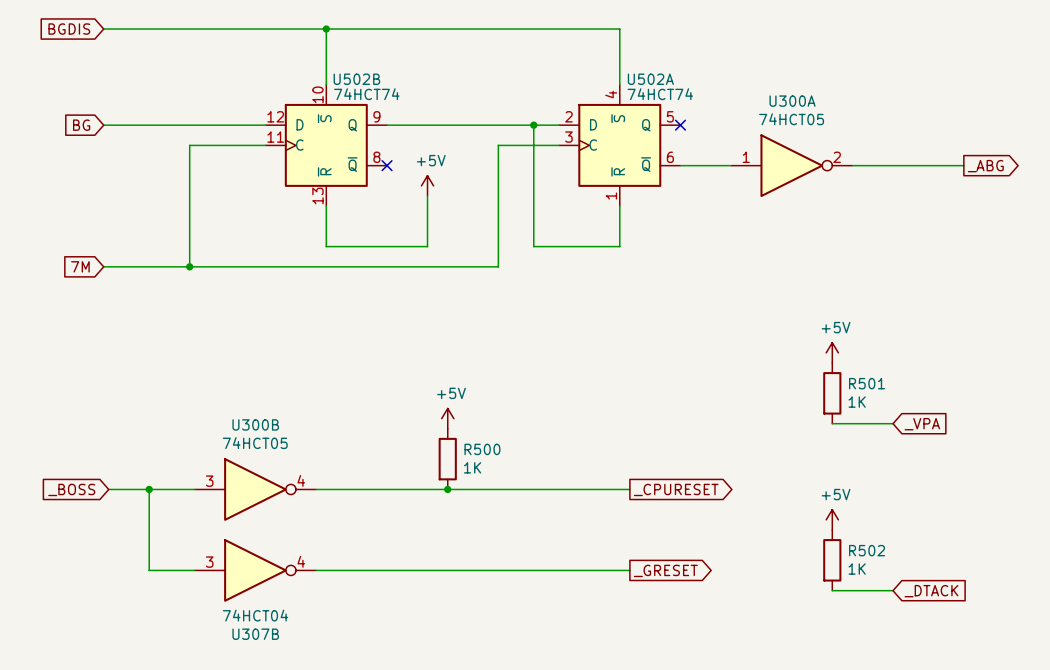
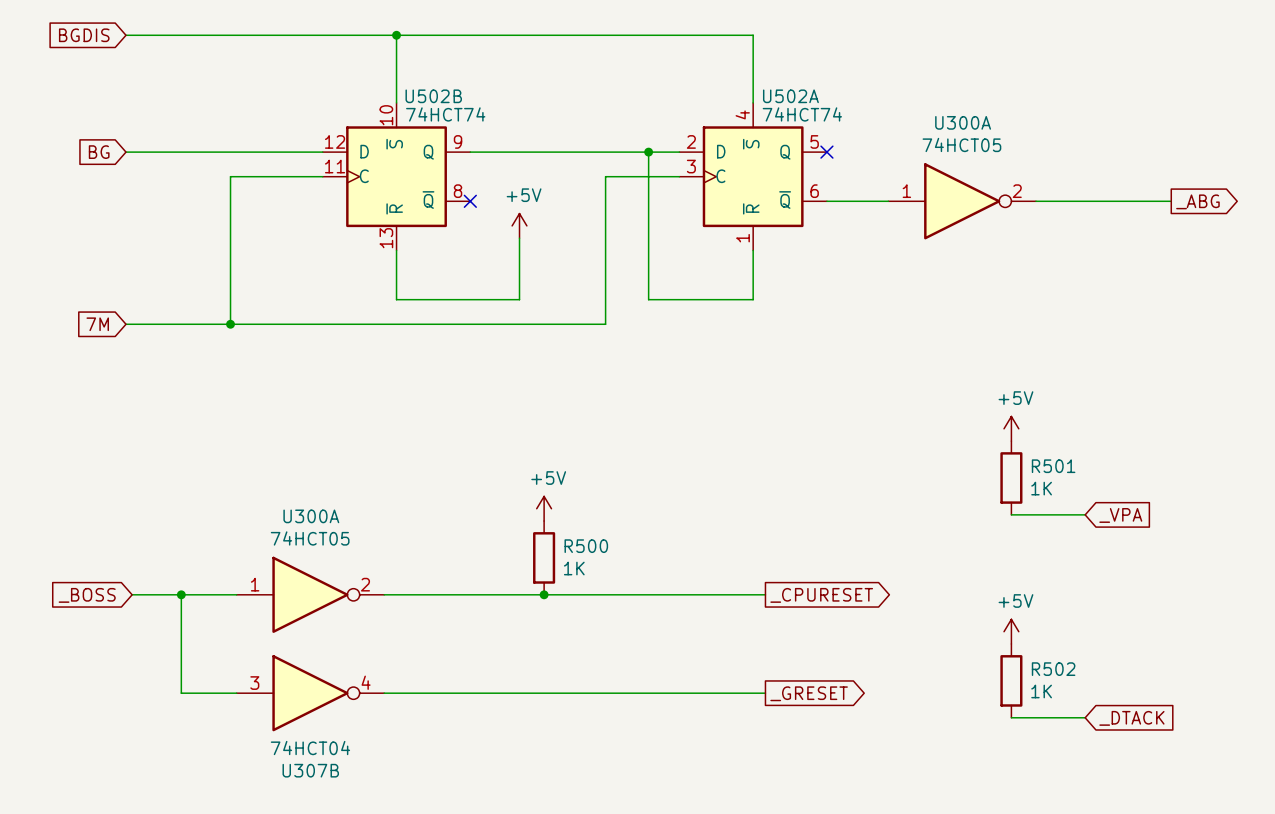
U300B name: U300B (255, 424) -> U300A (311, 516)
U300B pin number: 4 (301, 480) -> 2 (365, 584)
U300B pin number: 3 (209, 481) -> 1 (255, 584)

